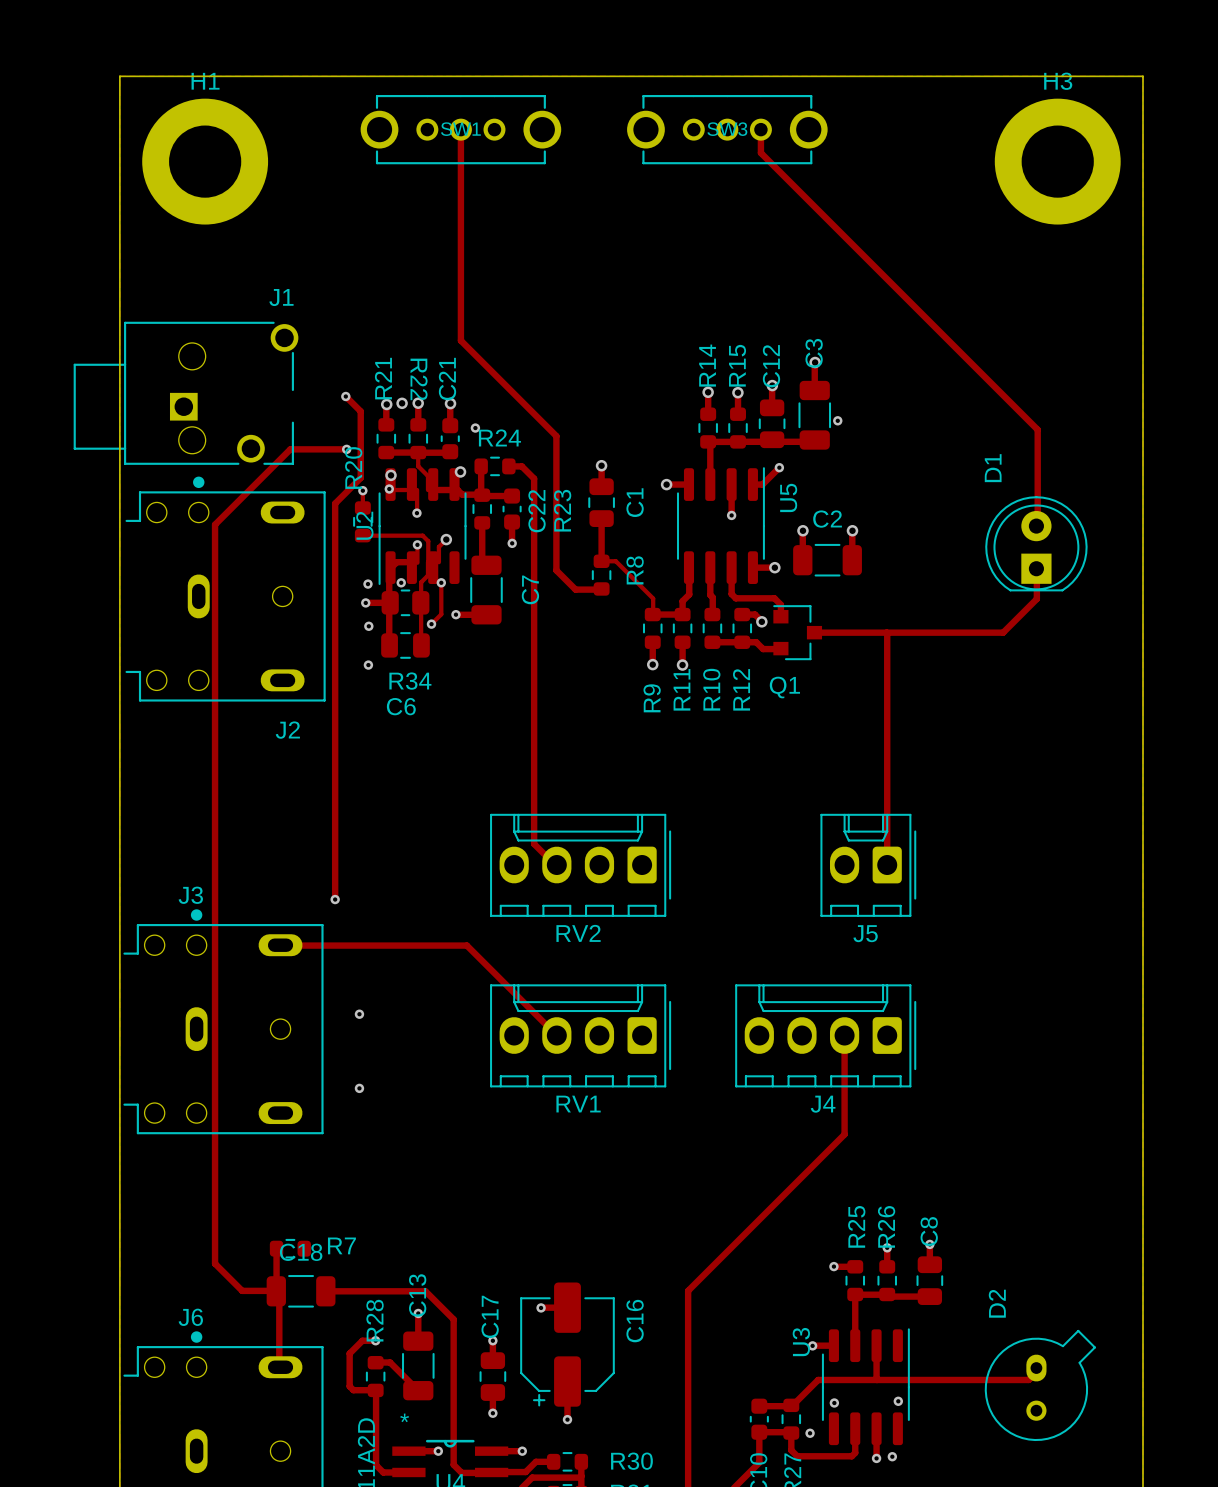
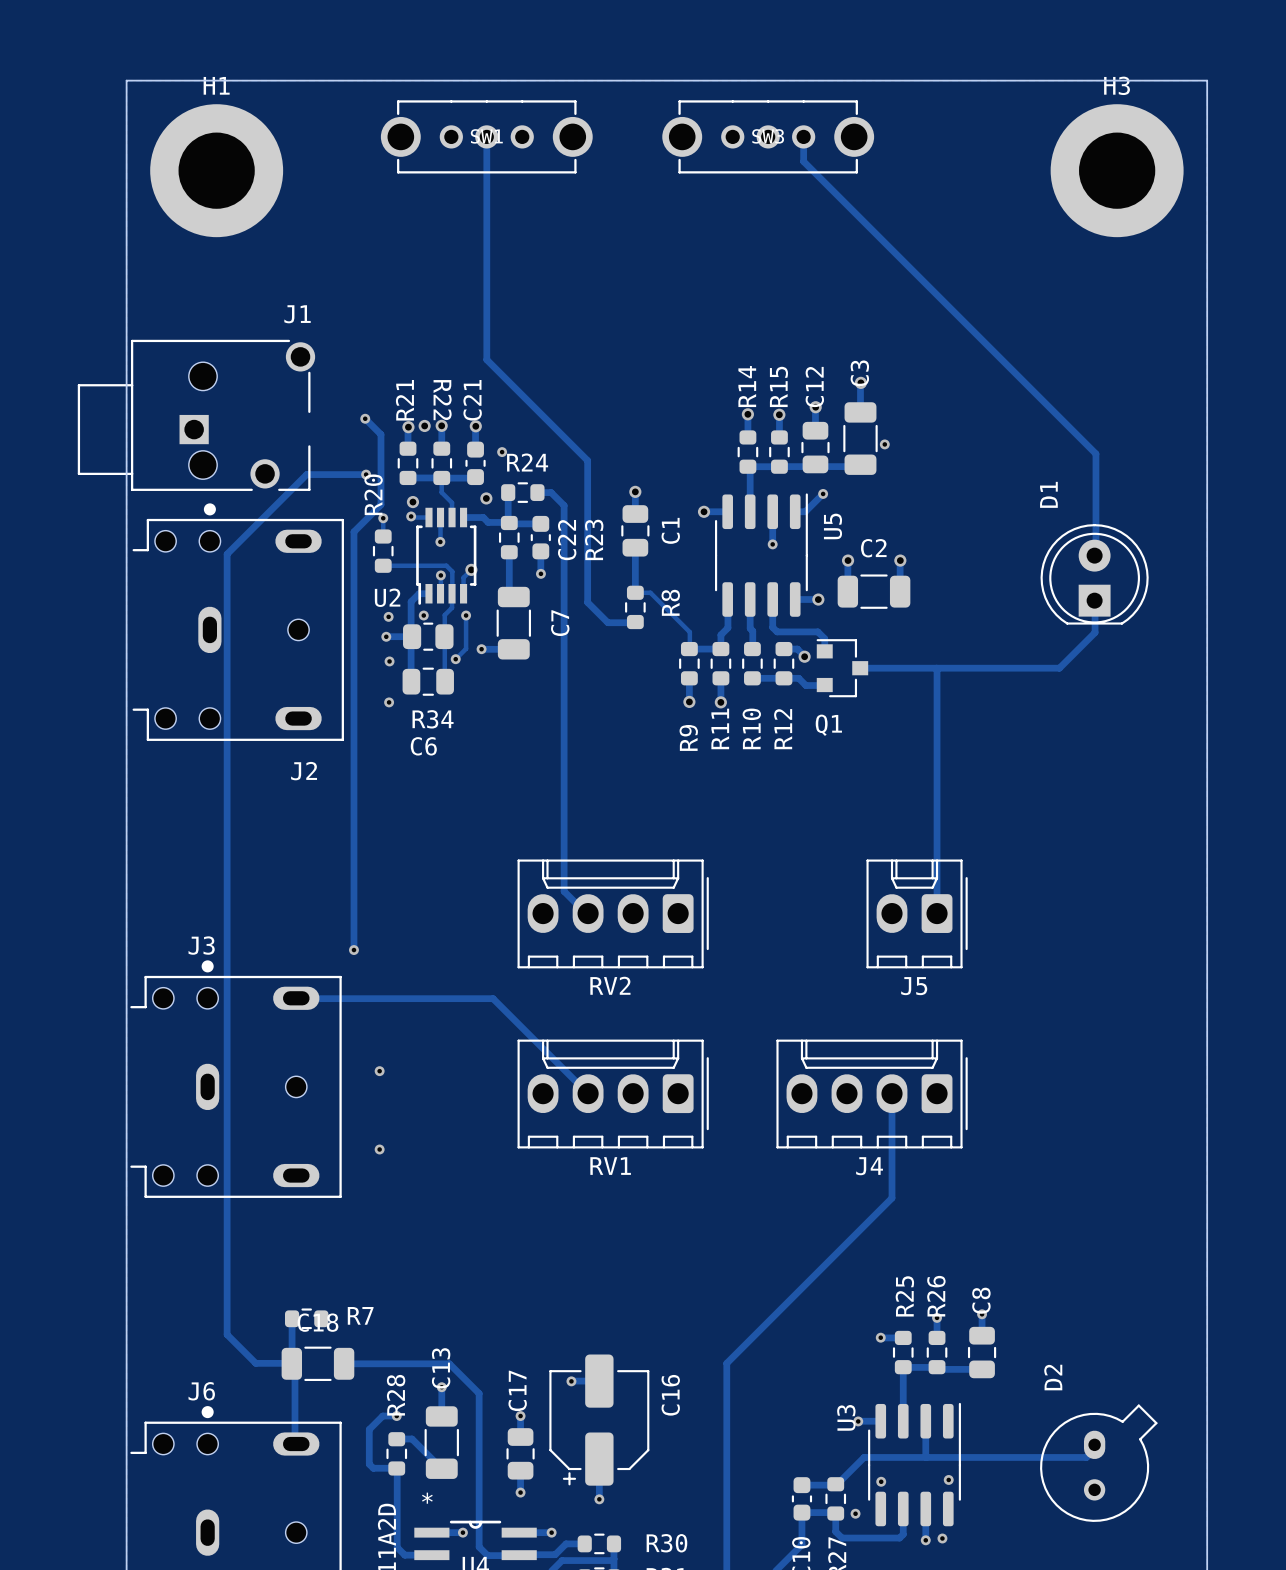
U2 footprint: [378, 468, 467, 586] -> [416, 507, 477, 605]
U2 name position: U2 (364, 525) -> U2 (387, 597)

